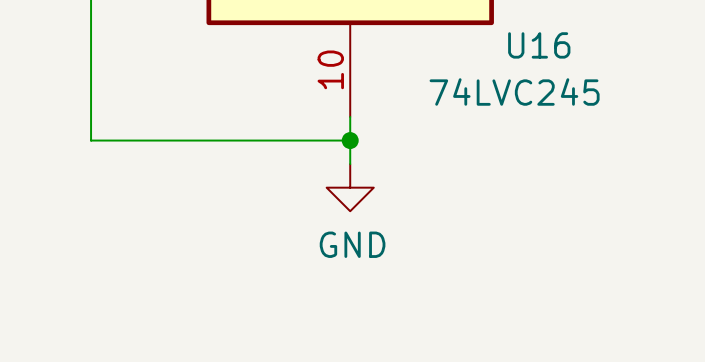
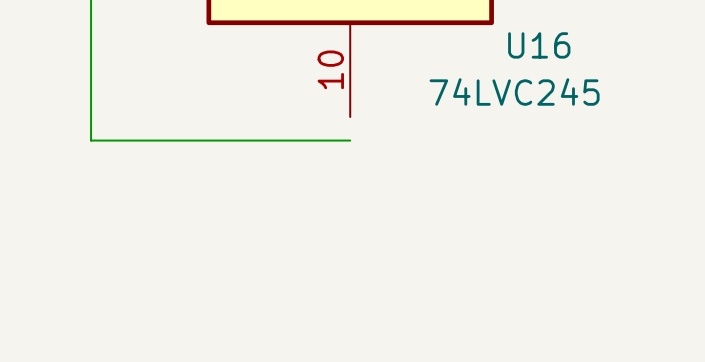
wire: (350, 116) (350, 164) -> none
junction: (350, 140) -> none
power symbol: GND (350, 187) -> none

